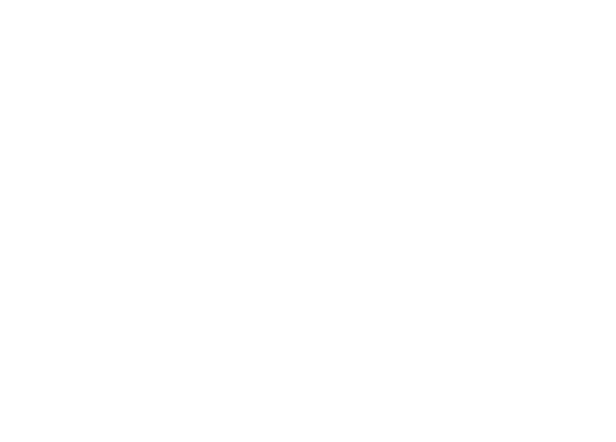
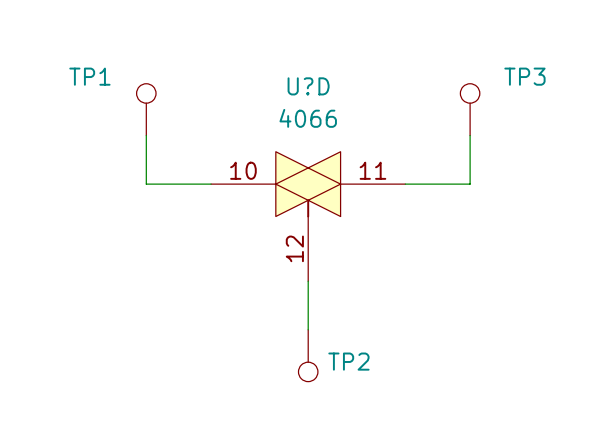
TP1: none -> (146, 109)
TP3: none -> (470, 109)
wire: none -> (146, 135) (146, 184) (211, 184)
wire: none -> (470, 135) (470, 184) (405, 184)
U?D: none -> 4066 (308, 216)
wire: none -> (308, 281) (308, 329)
TP2: none -> (308, 355)

